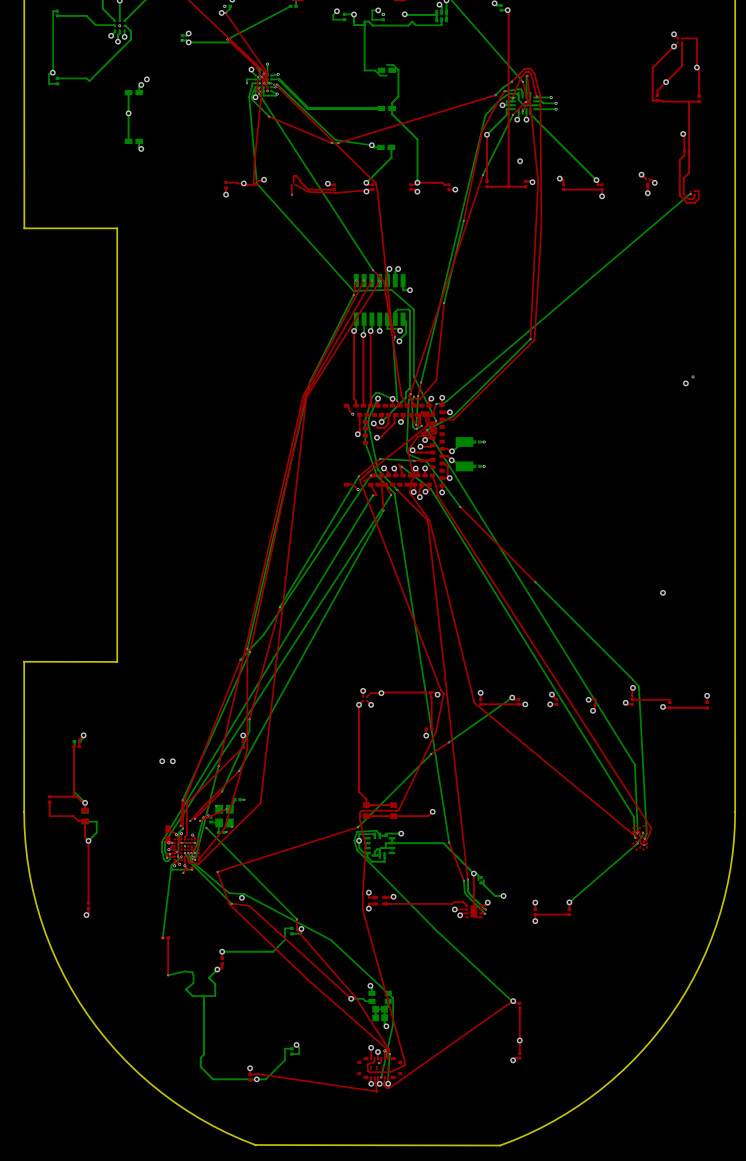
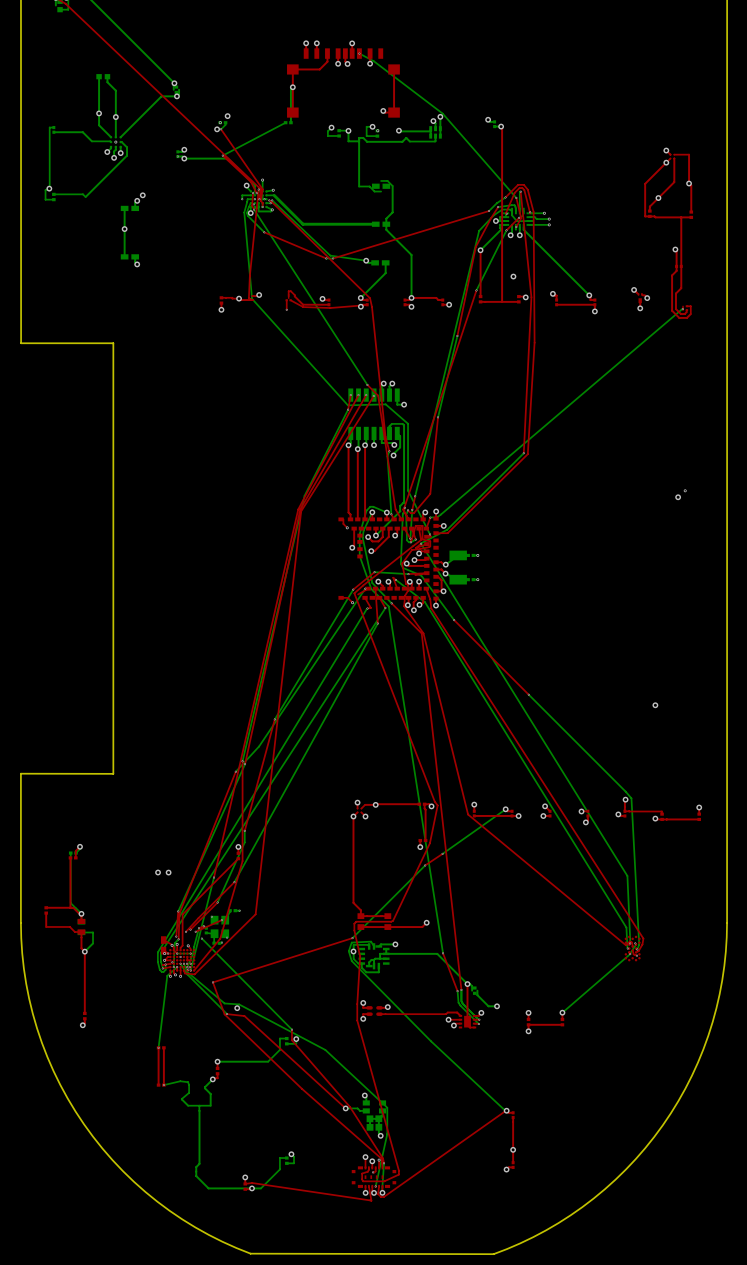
bottom track: (170, 867) (172, 869) (192, 869) -> none
top track: (186, 867) (183, 872) -> none
part position: (189, 867) -> (161, 1085)
via: (192, 869) -> none
via: (183, 873) -> none
top track: none -> (158, 1047) (158, 1085)

